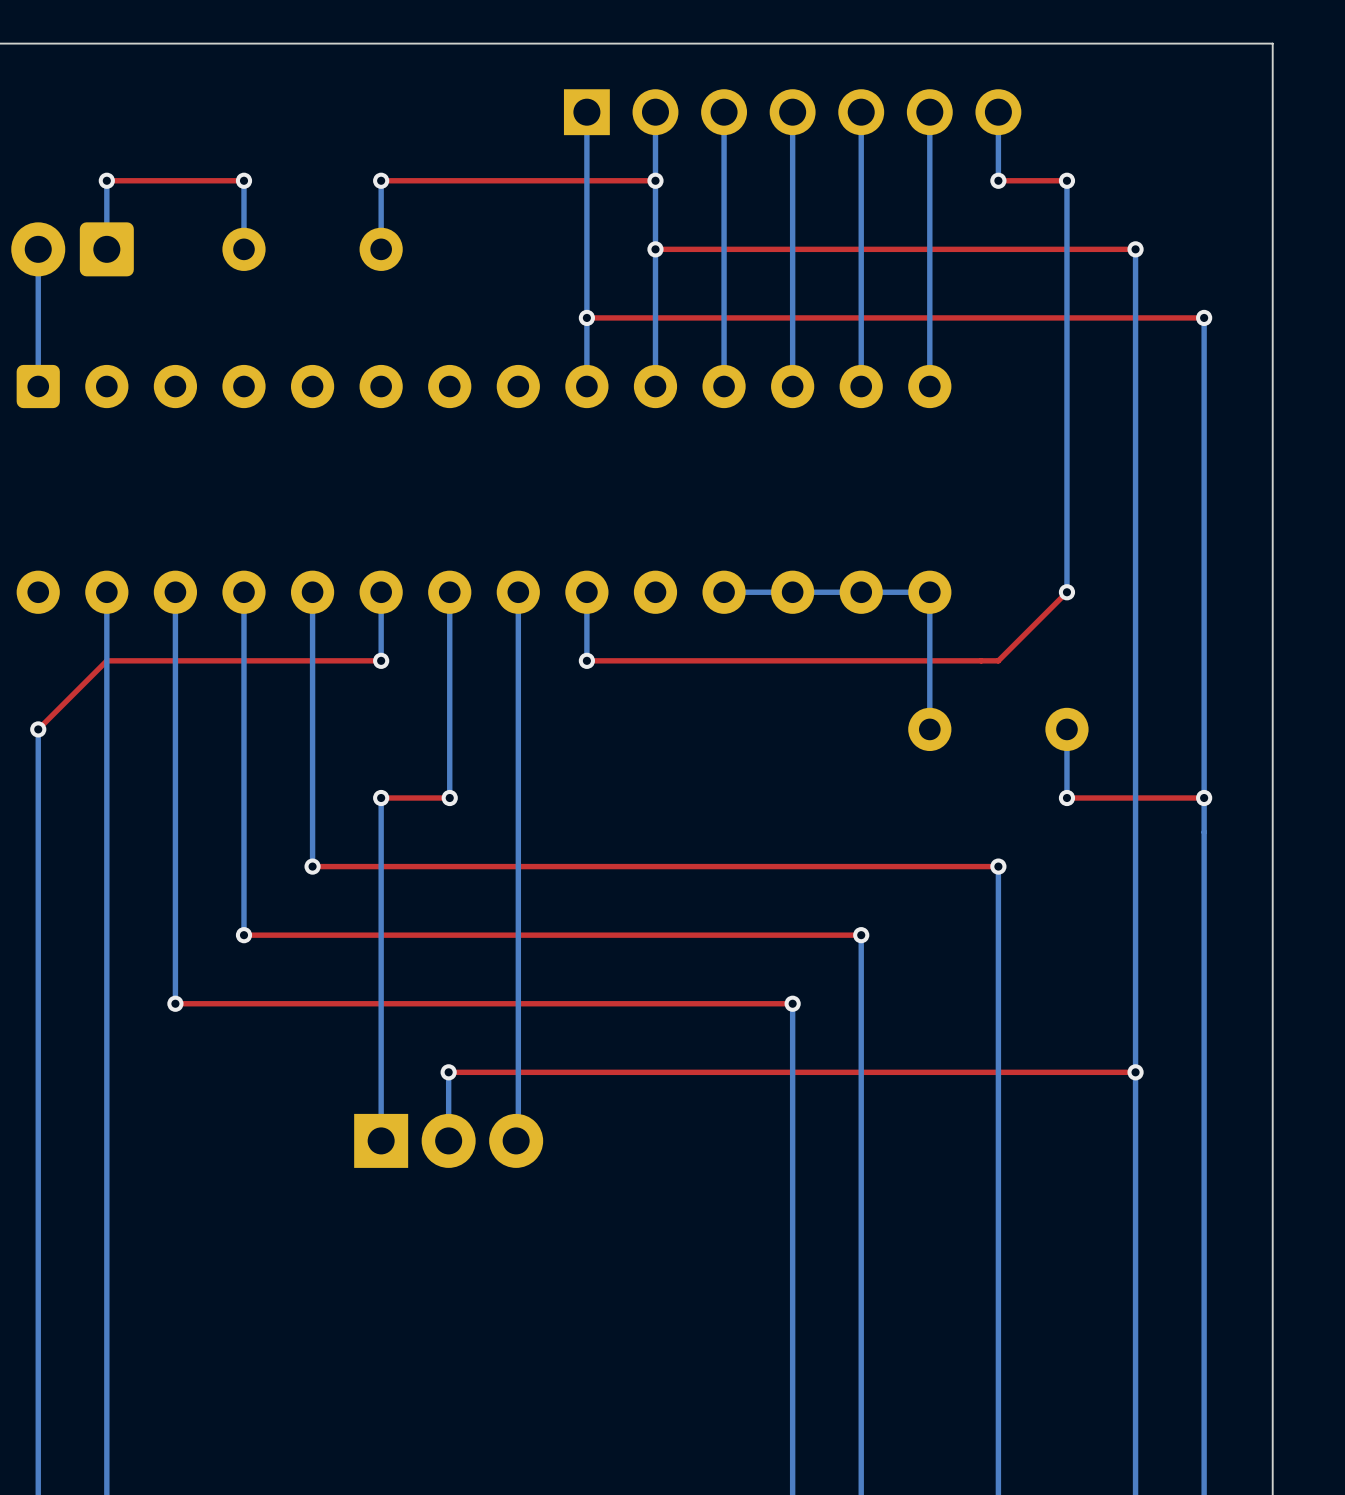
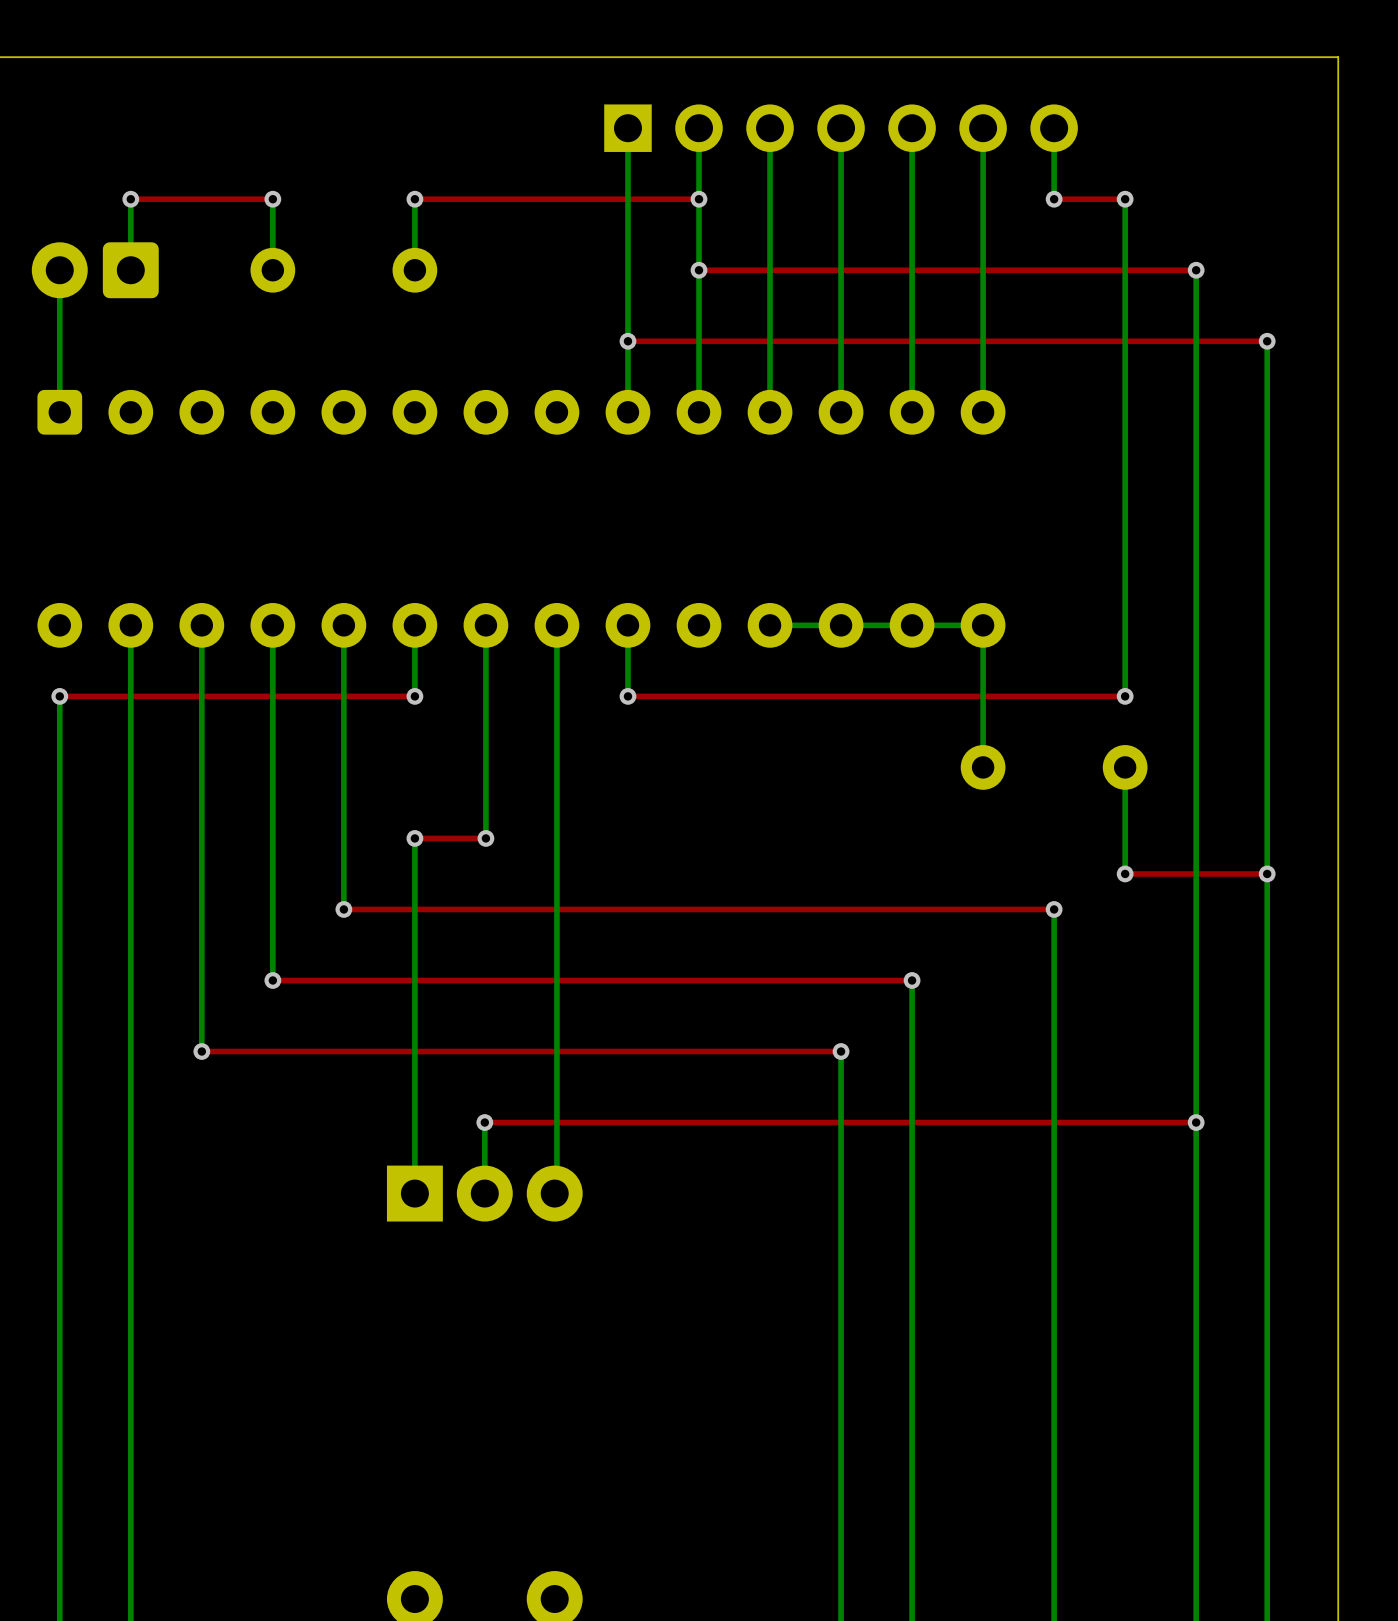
top track: (1066, 592) (998, 660) -> (1125, 696) (1054, 696)
bottom track: none -> (1125, 625) (1125, 696)
via: (1066, 592) -> none
bottom track: none -> (59, 696) (59, 767)
top track: (106, 660) (38, 729) -> (130, 696) (59, 696)
via: none -> (1125, 696)
via position: (38, 729) -> (59, 696)
bottom track: none -> (1125, 838) (1125, 873)
via position: (1066, 798) -> (1125, 873)
top track: (1204, 798) (1066, 798) -> (1267, 873) (1125, 873)
via position: (1204, 798) -> (1267, 873)

